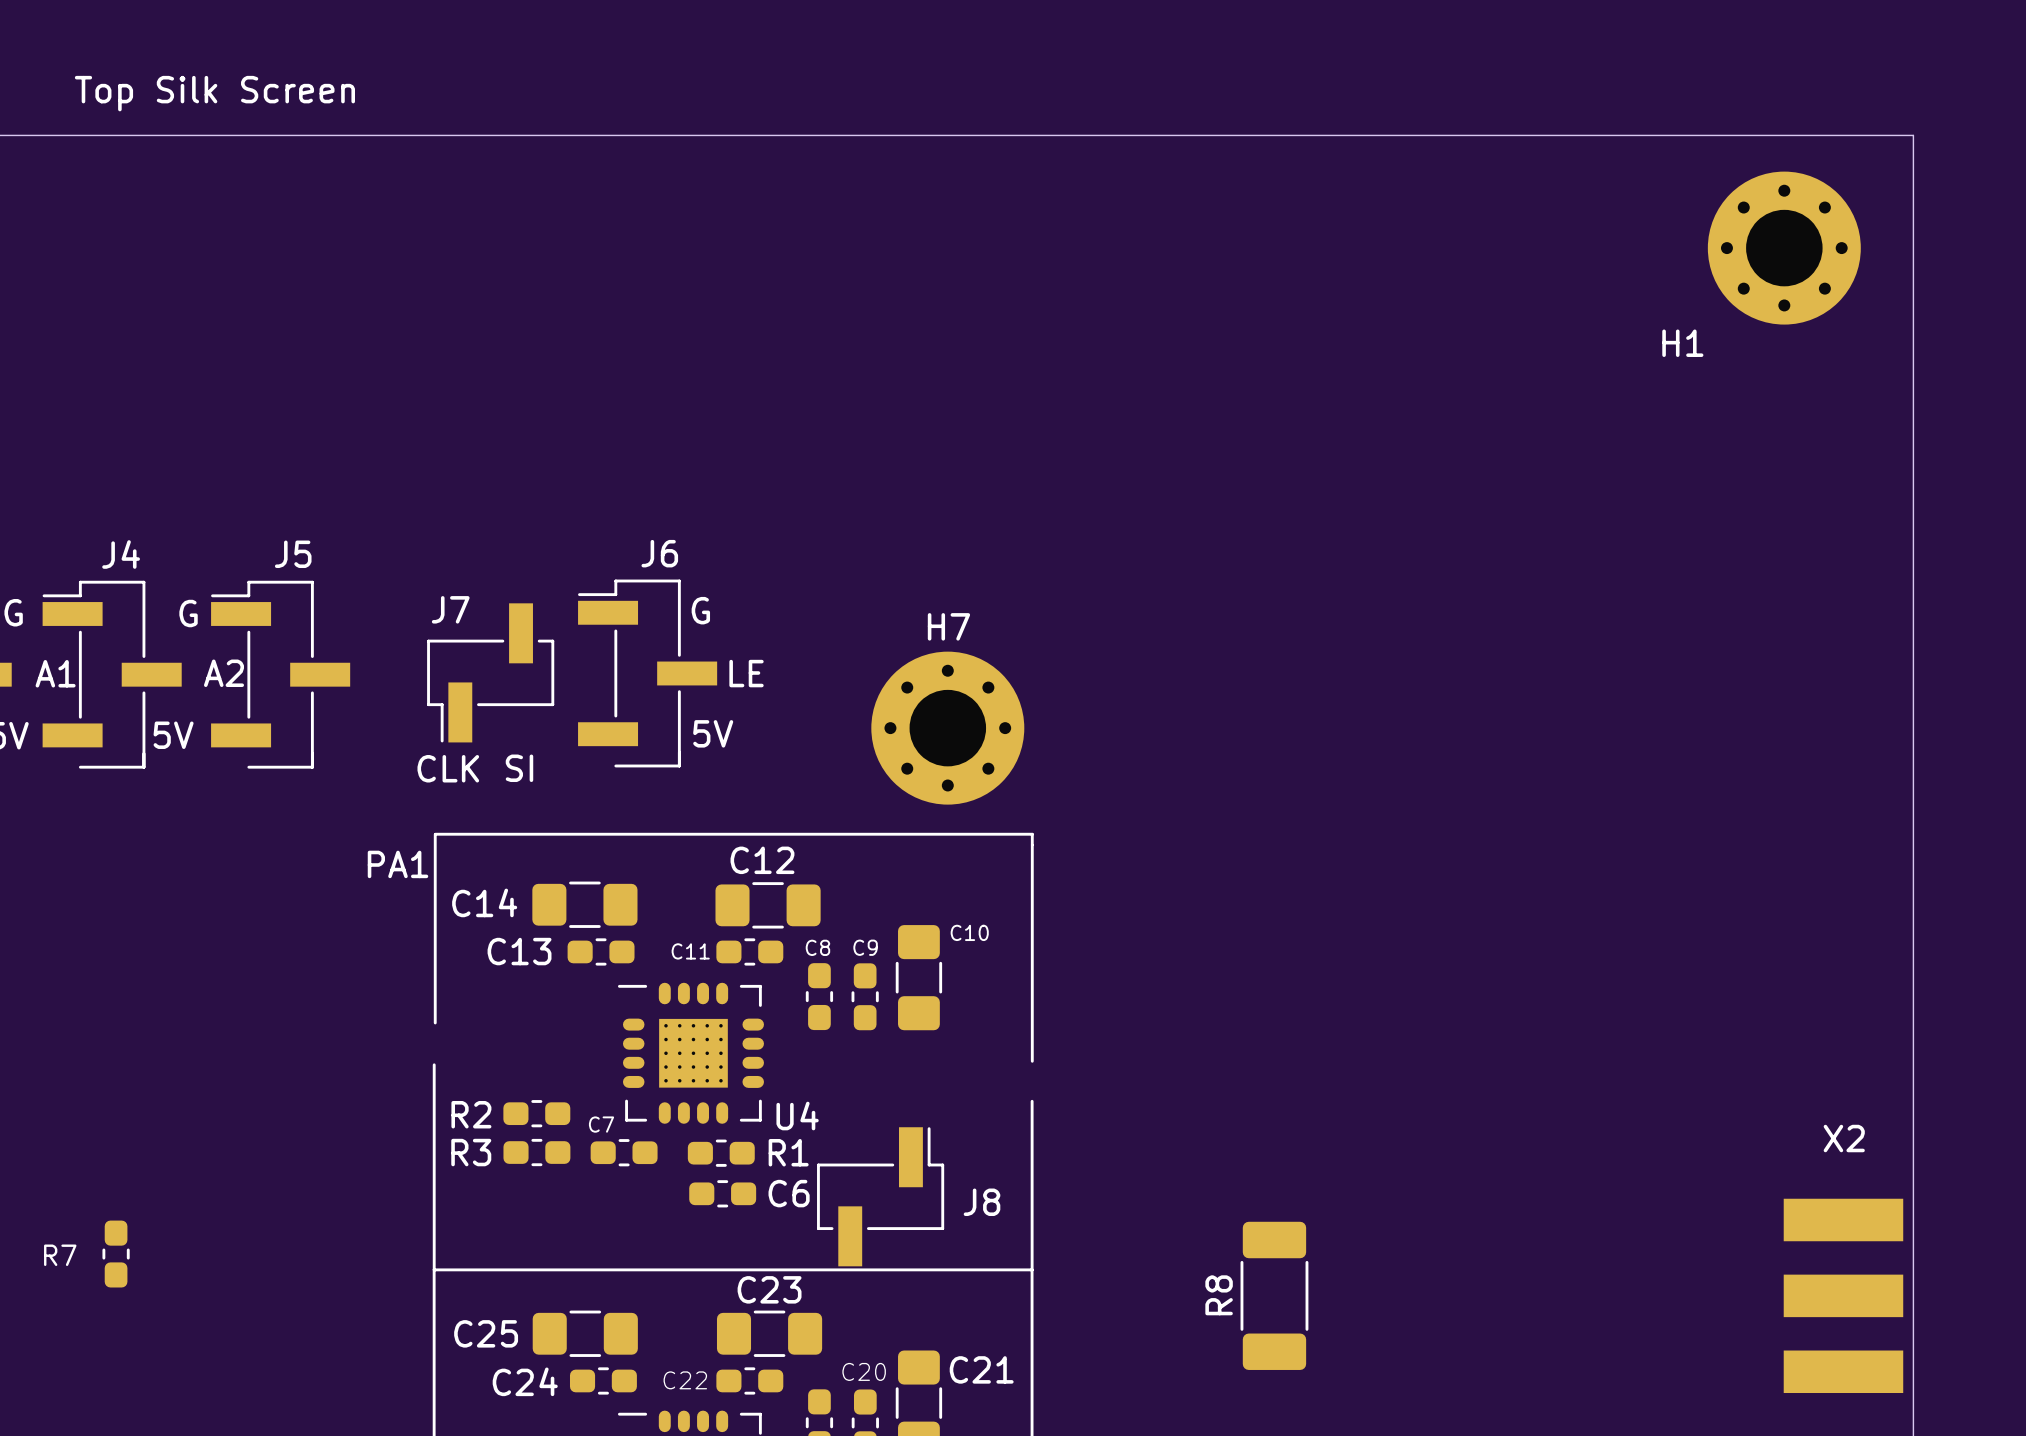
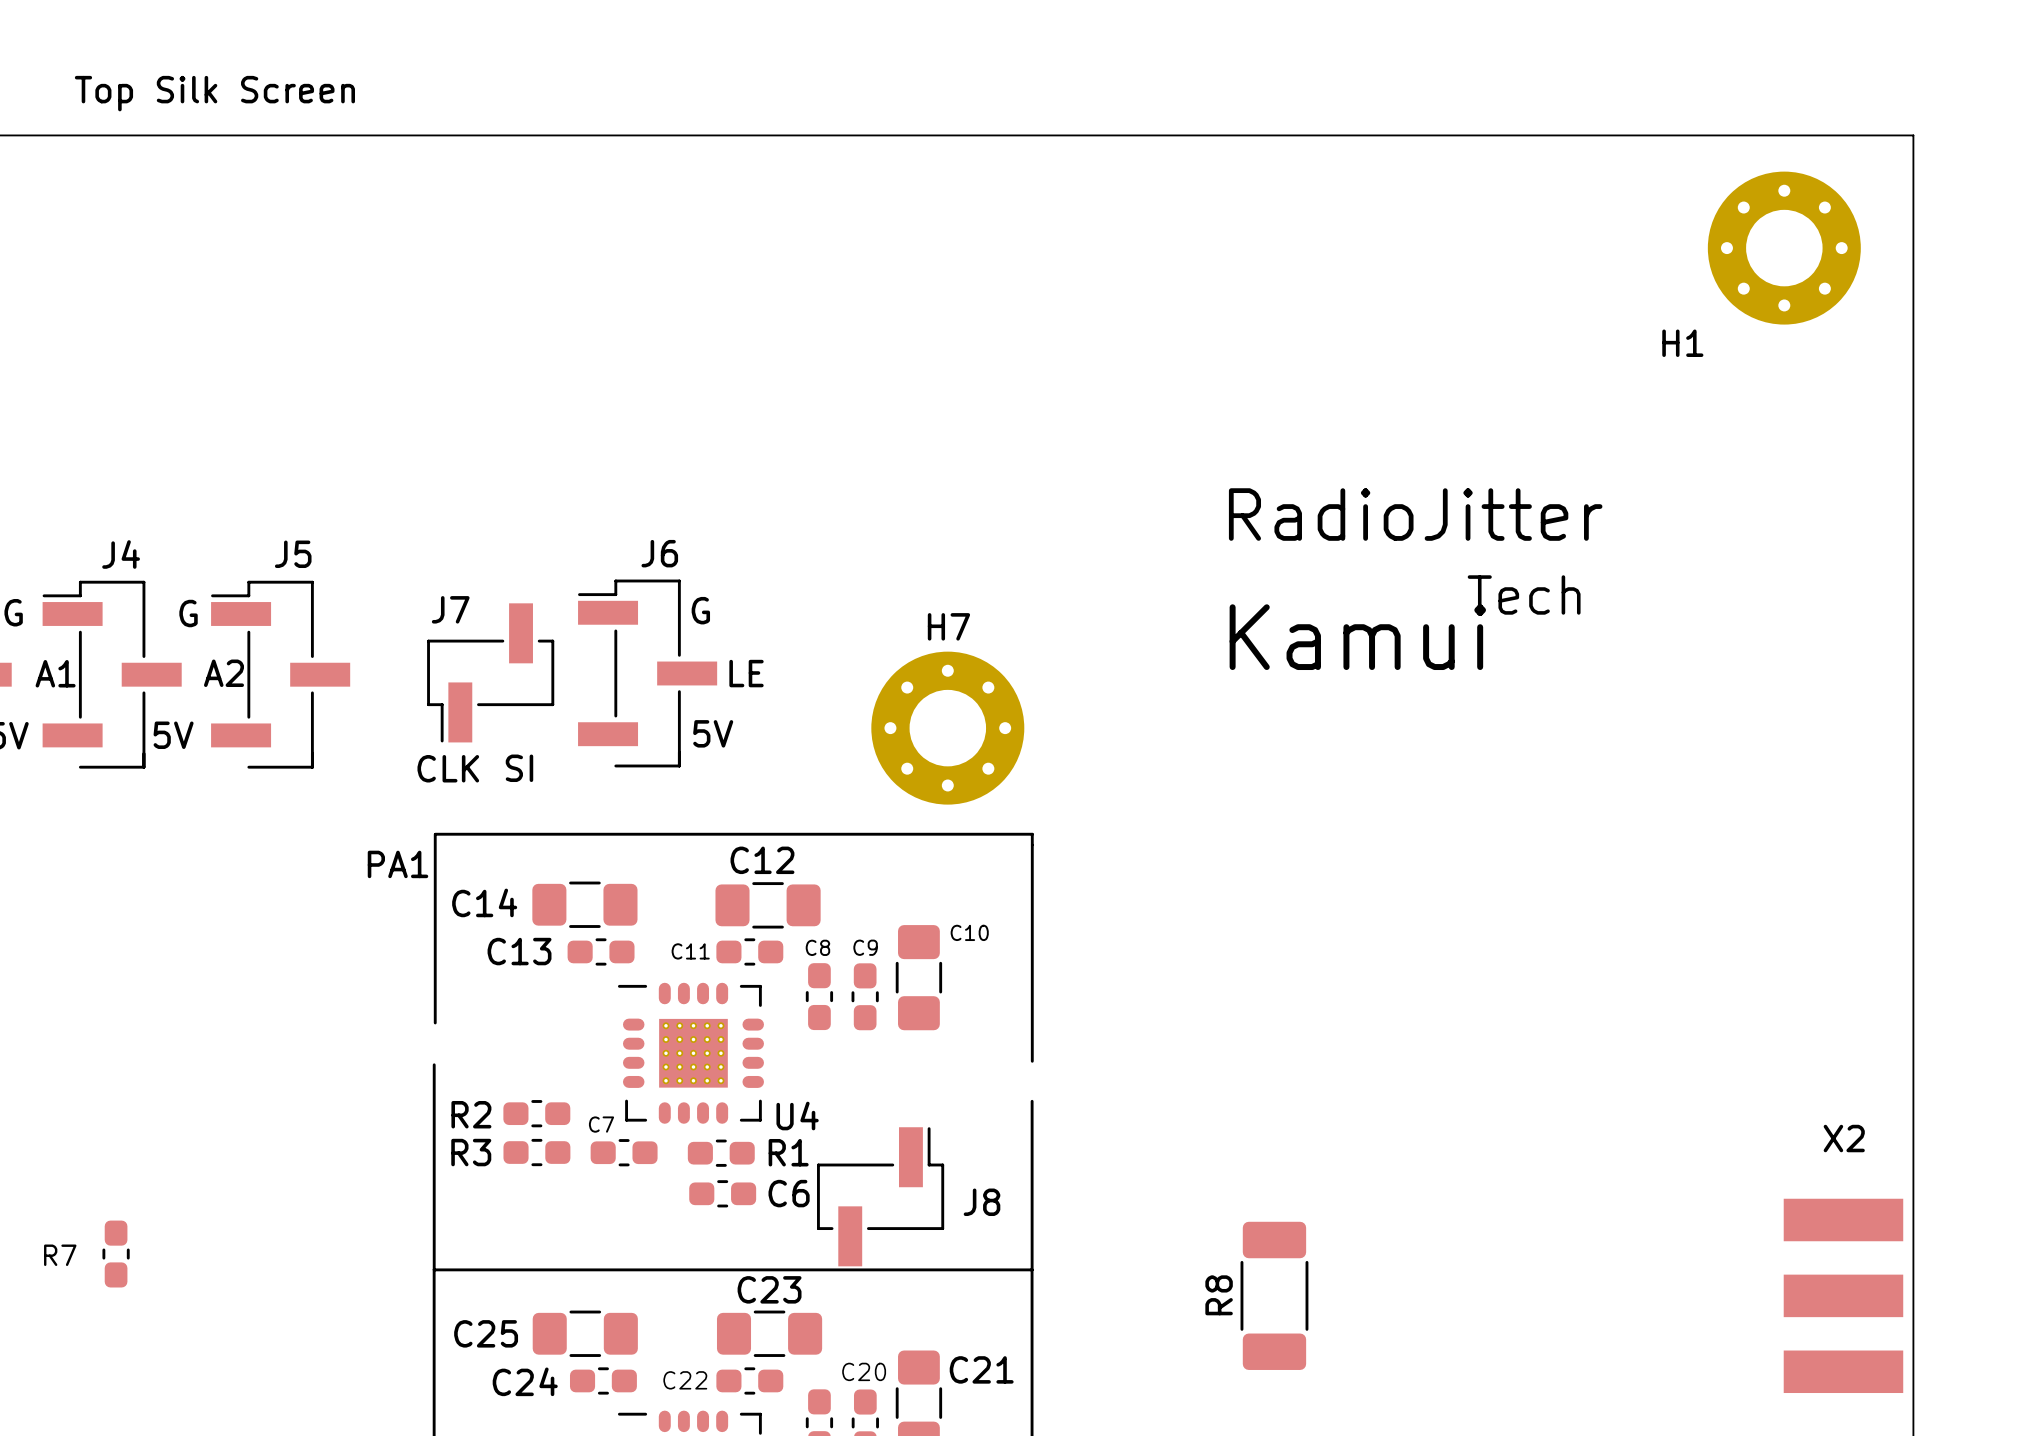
text: none -> RadioJitter (1415, 514)
text: none -> Tech (1524, 594)
text: none -> Kamui (1357, 637)

